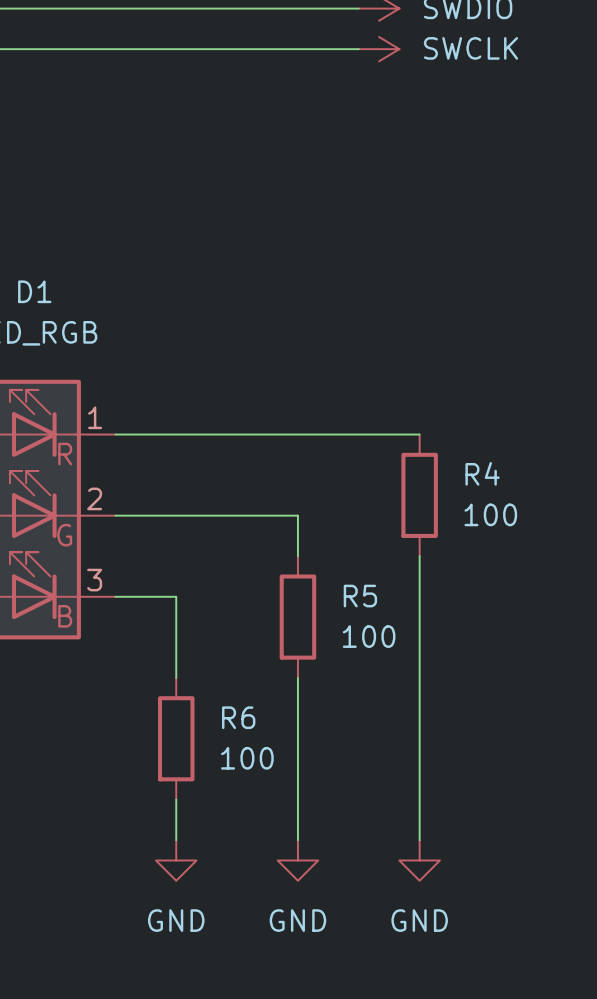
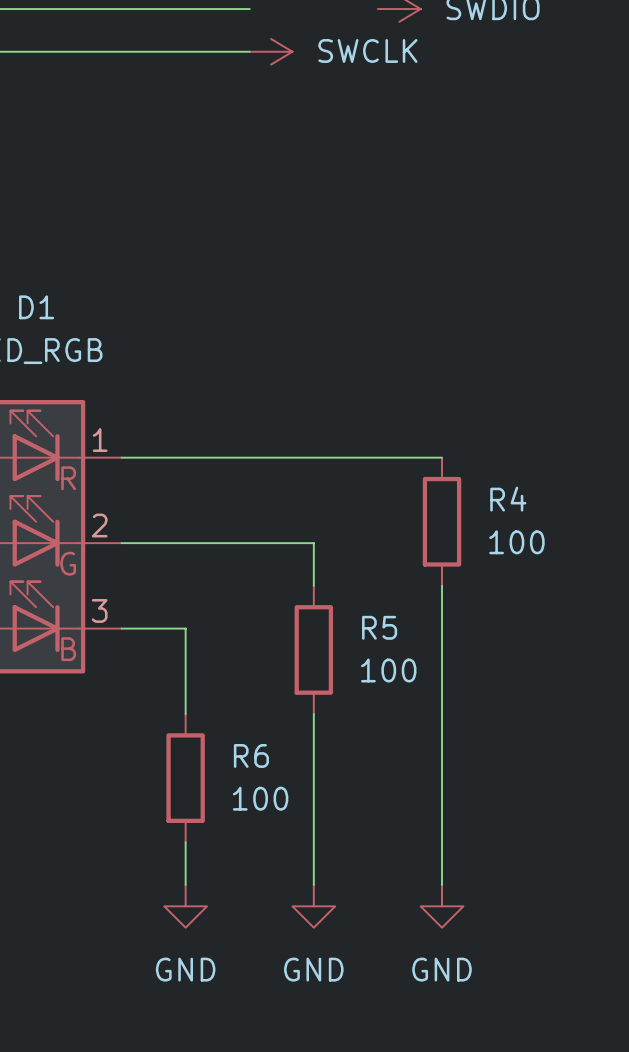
wire: (237, 8) (358, 8) -> none
wire: (237, 49) (358, 49) -> none
power symbol position: SWCLK (379, 49) -> SWCLK (271, 51)

